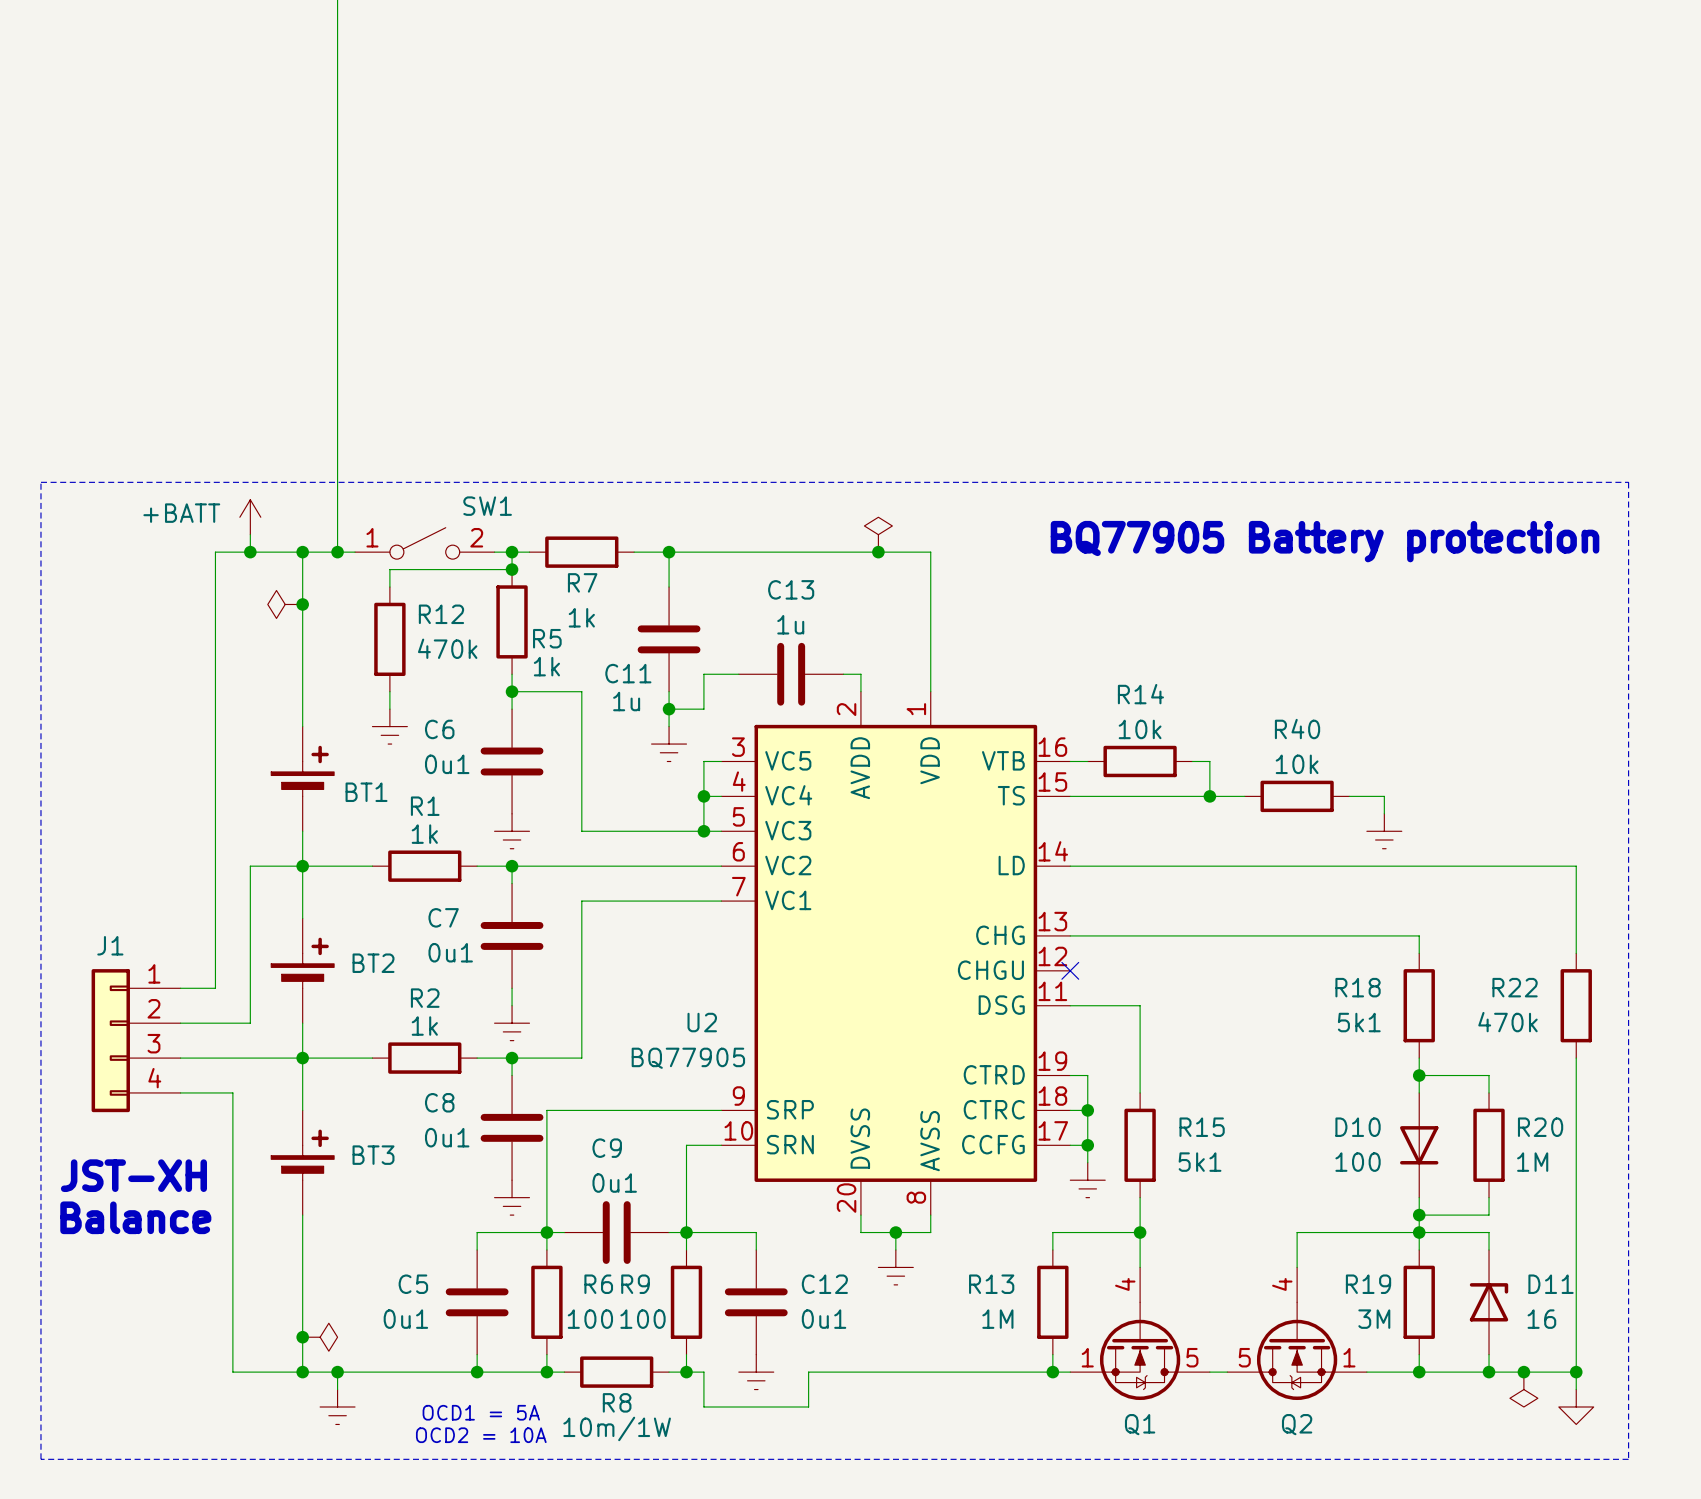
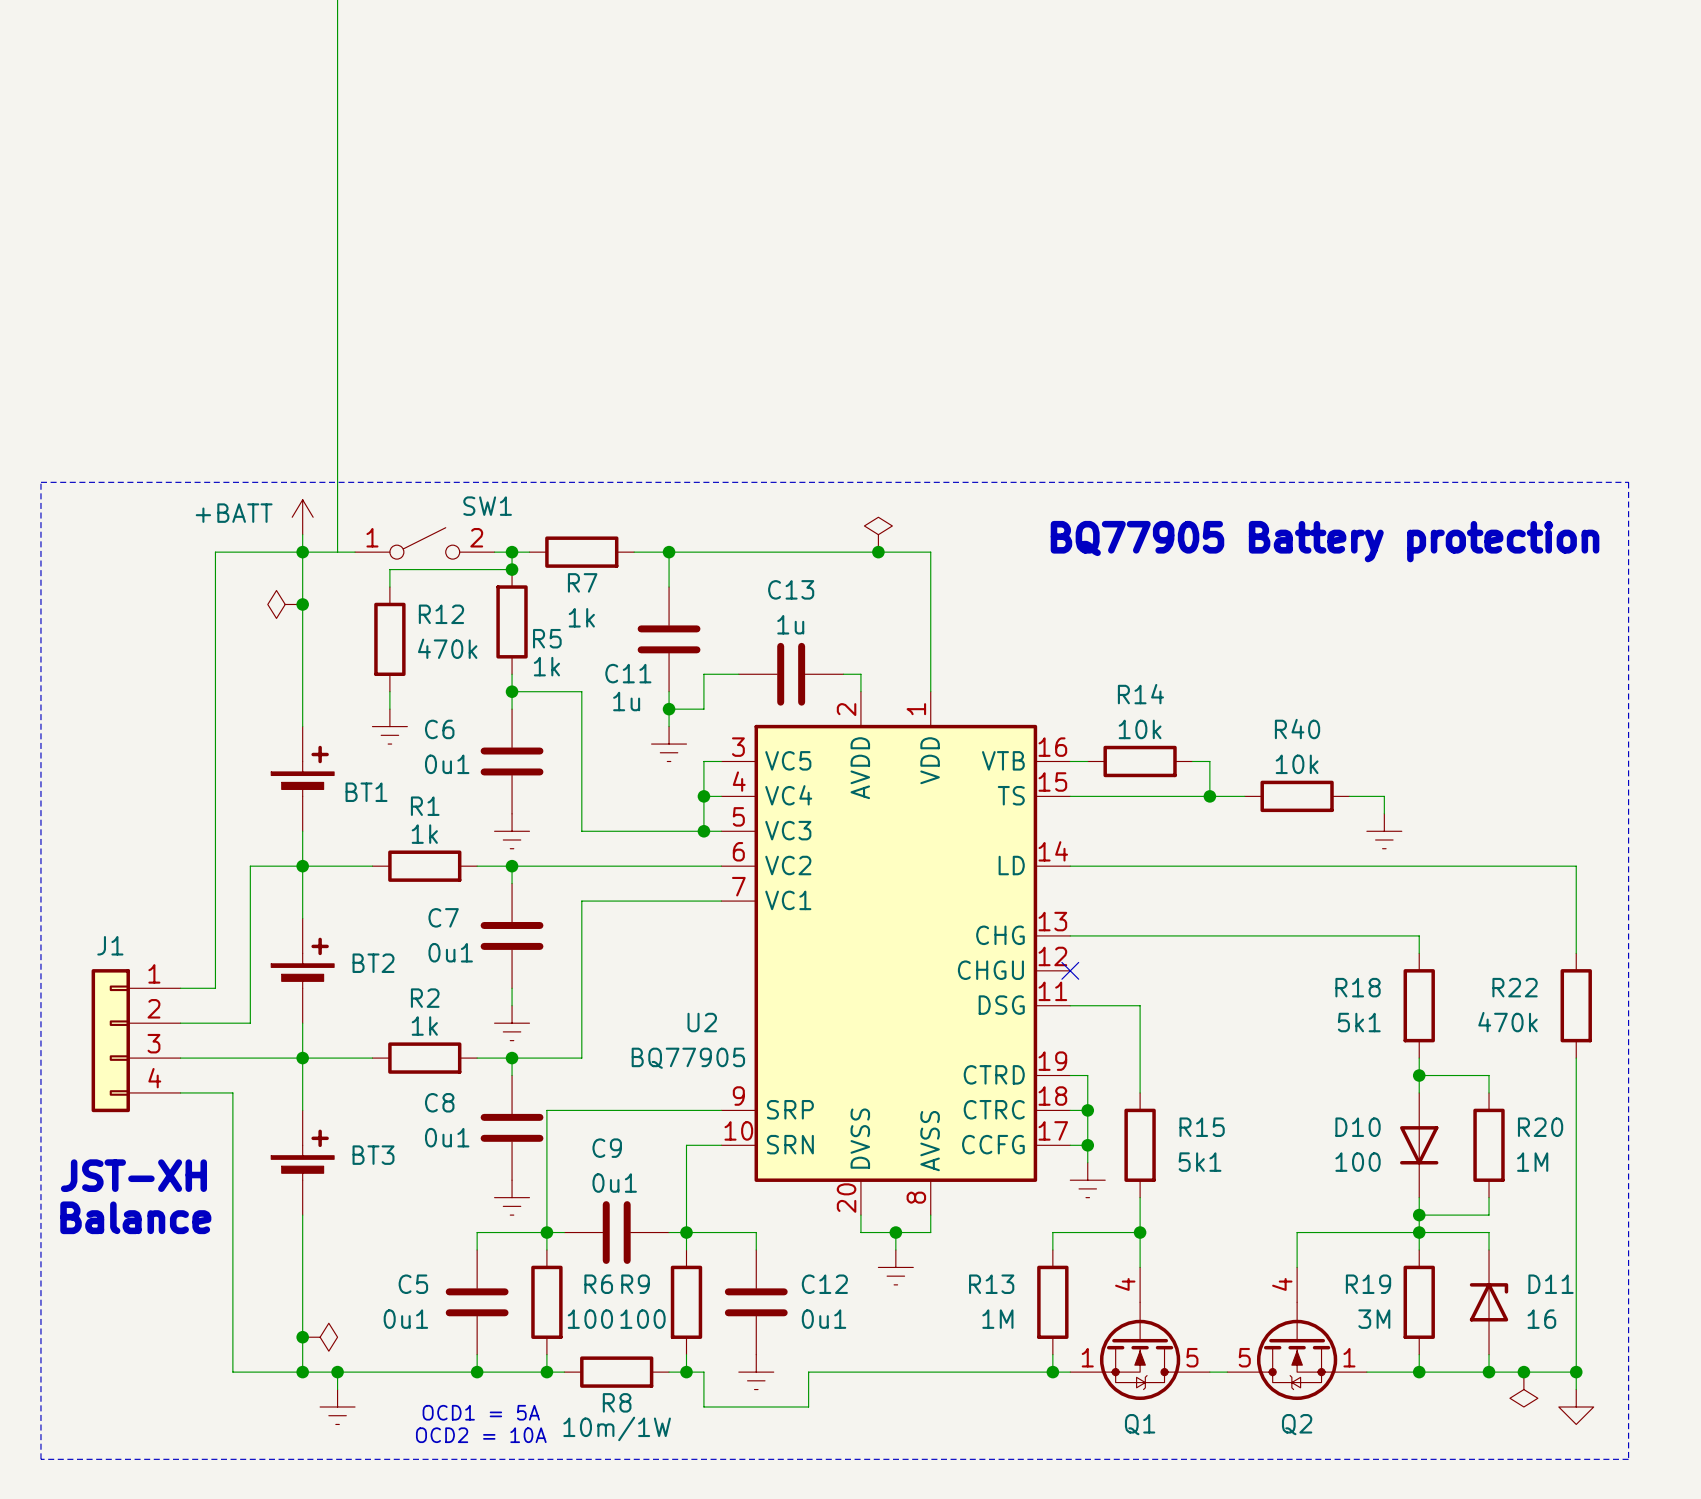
power symbol position: +BATT (250, 517) -> +BATT (302, 517)
wire: (250, 534) (250, 552) -> (302, 534) (302, 552)
junction: (250, 552) -> none
junction: (337, 552) -> none

